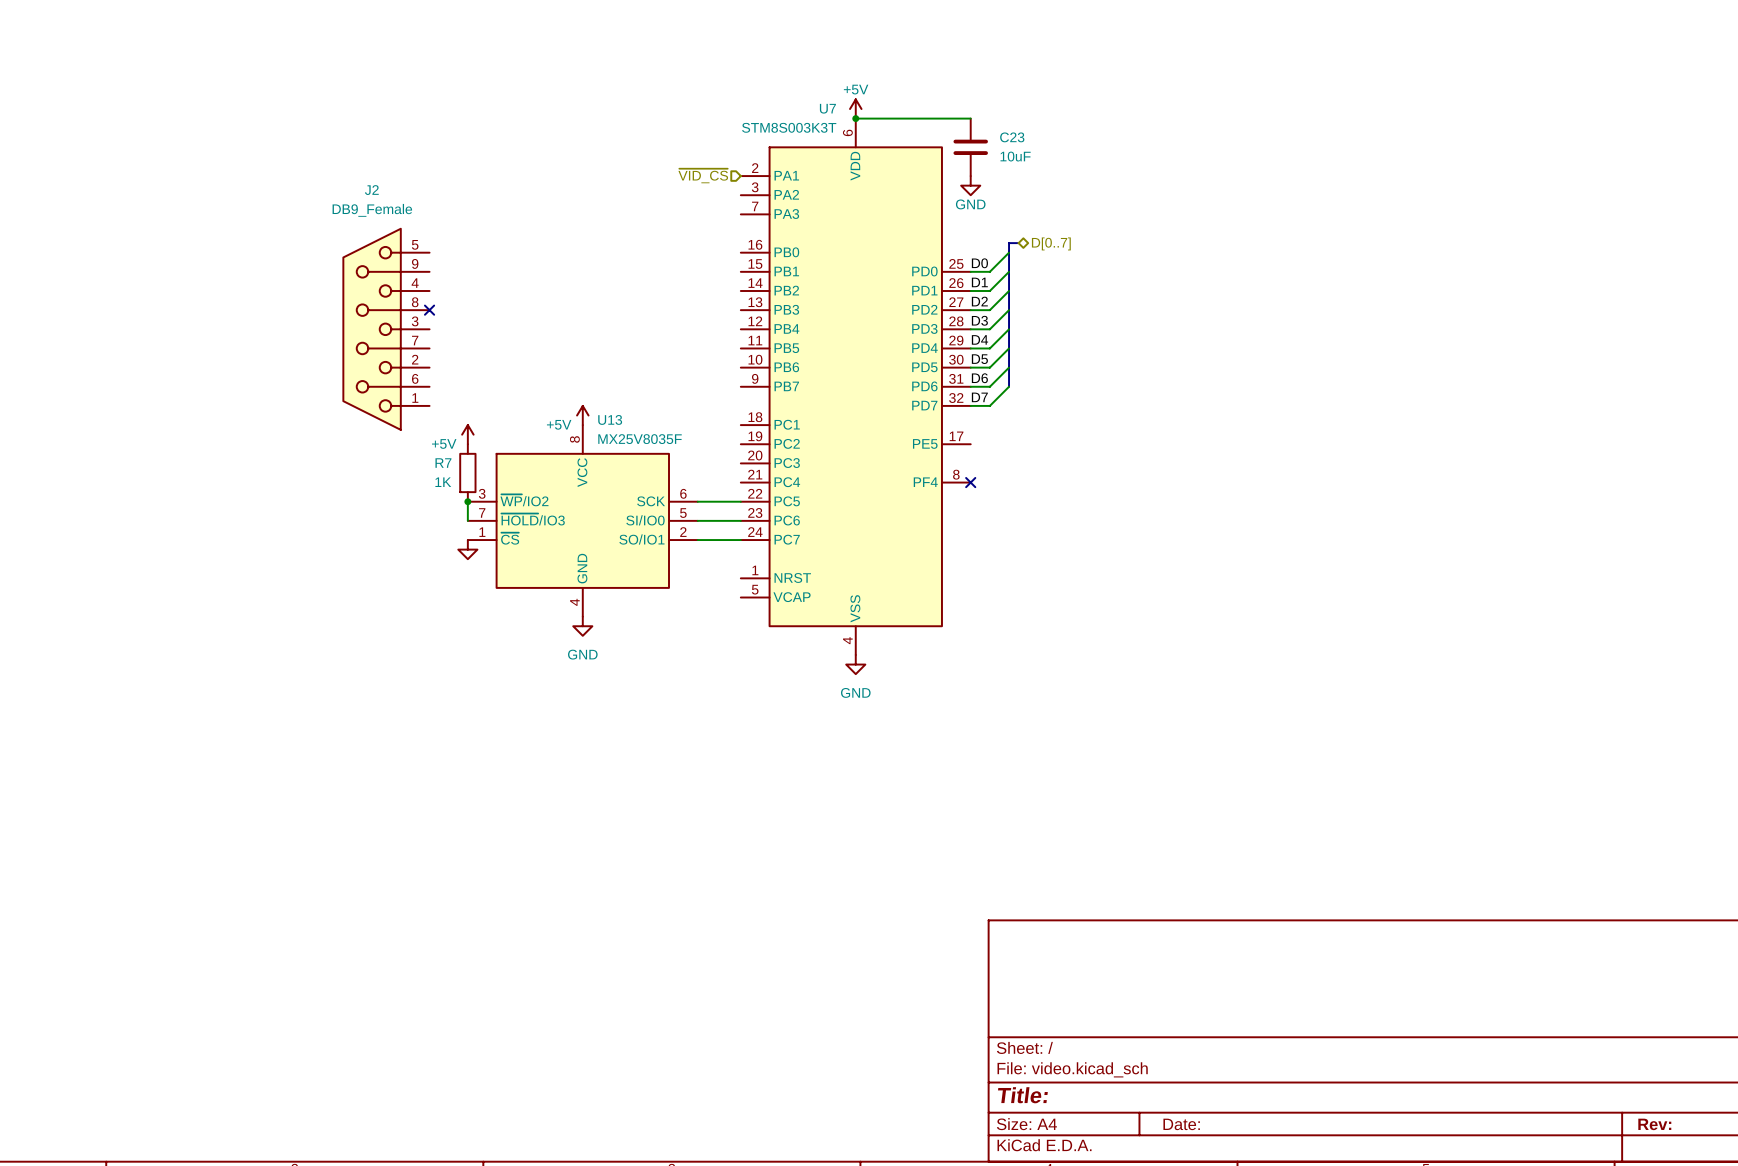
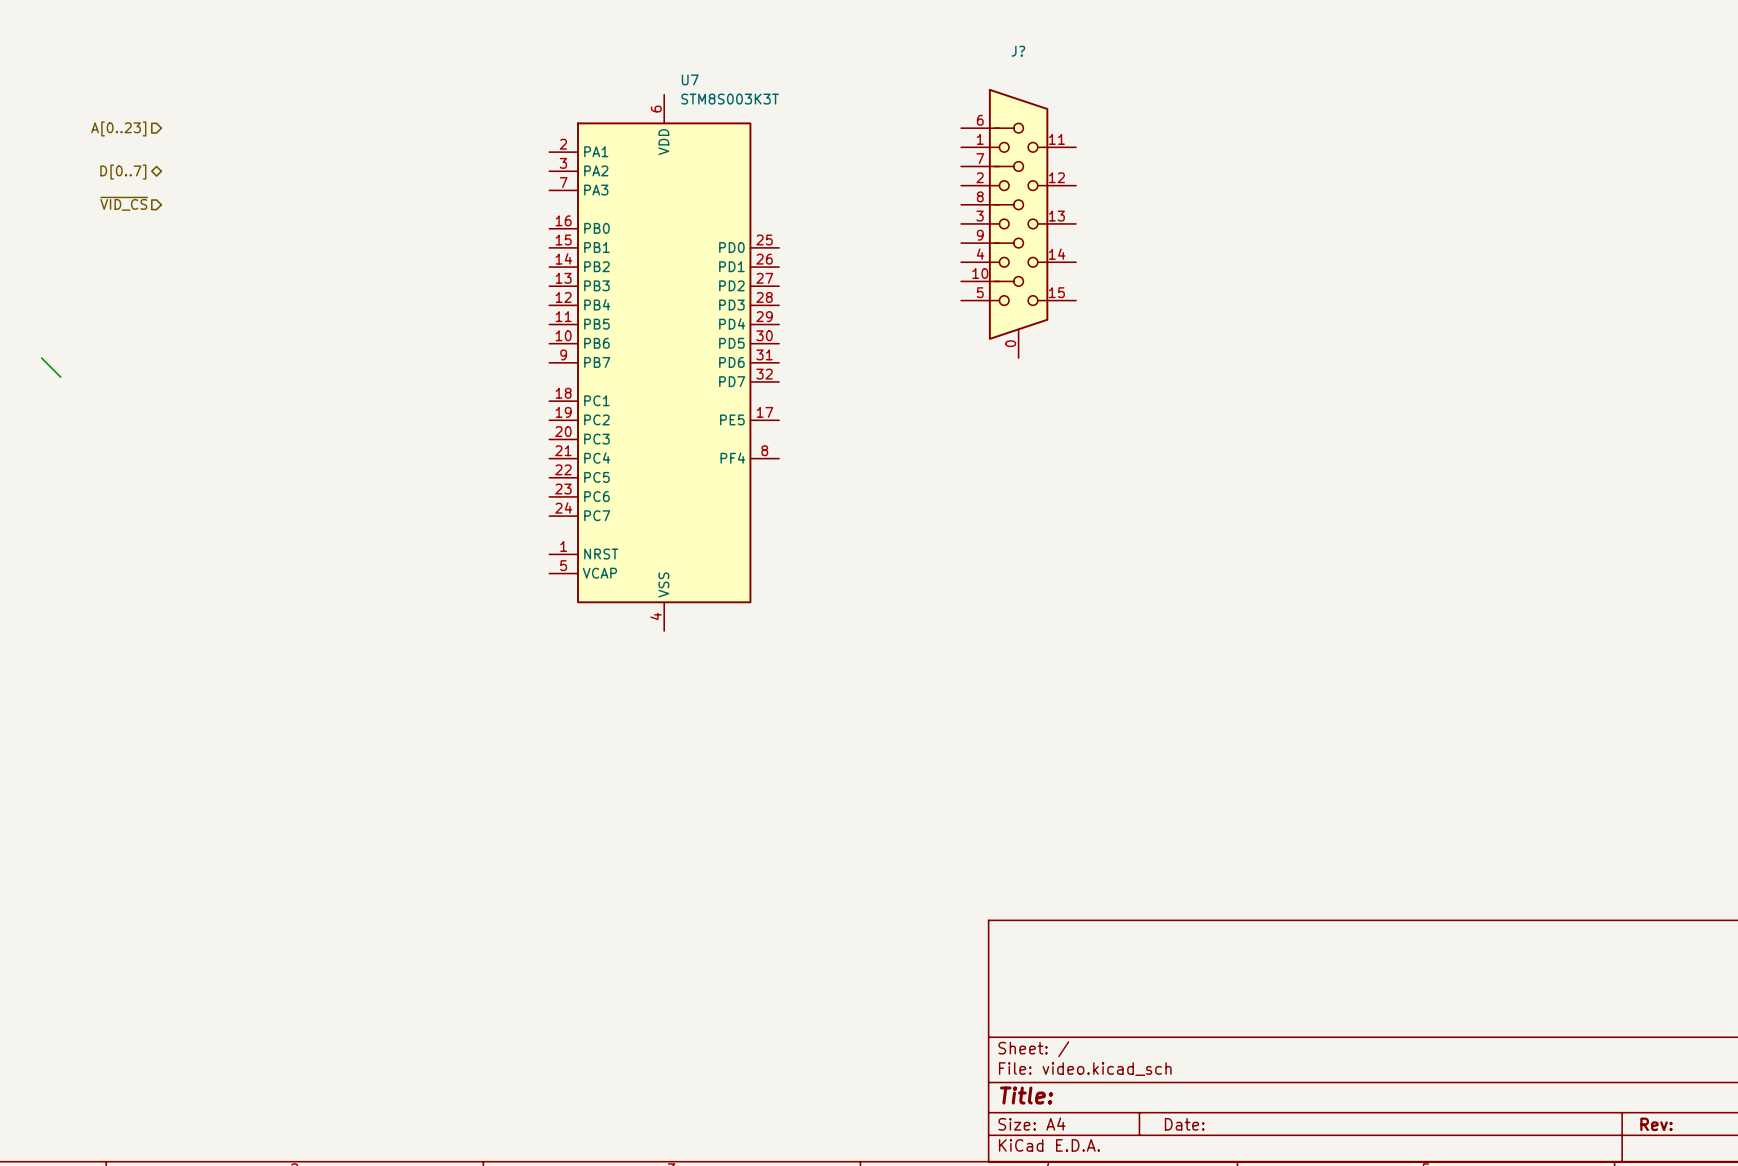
U7 name position: U7 (827, 108) -> U7 (690, 79)
power symbol: +5V (855, 109) -> none
wire: (855, 118) (970, 118) -> none
junction: (855, 118) -> none
U7 value position: STM8S003K3T (789, 127) -> STM8S003K3T (730, 99)
hierarchical label: none -> A[0..23] (118, 128)
C23: 10uF (970, 147) -> none
hierarchical label: none -> D[0..7] (123, 172)
hierarchical label: ~{VID_CS} (703, 175) -> none
power symbol: GND (970, 185) -> none
hierarchical label: none -> ~{VID_CS} (124, 203)
J?: none -> (1018, 223)
bus: (1018, 243) (1009, 243) (1009, 386) -> none
hierarchical label: D[0..7] (1051, 243) -> none
label: D0 (979, 263) -> none
wire: (970, 271) (989, 271) -> none
label: D1 (979, 282) -> none
wire: (970, 291) (989, 291) -> none
label: D2 (979, 301) -> none
no-connect mark: (429, 310) -> none
wire: (970, 310) (989, 310) -> none
label: D3 (979, 320) -> none
J2: DB9_Female (385, 329) -> none
wire: (970, 329) (989, 329) -> none
wire: (1009, 329) (989, 348) -> none
label: D4 (979, 339) -> none
wire: (970, 348) (989, 348) -> none
wire: (1009, 348) (989, 367) -> none
wire: none -> (41, 358) (60, 377)
label: D5 (979, 359) -> none
wire: (970, 367) (989, 367) -> none
wire: (1009, 367) (989, 386) -> none
label: D6 (979, 378) -> none
U7 position: (855, 386) -> (664, 362)
wire: (970, 386) (989, 386) -> none
wire: (1009, 386) (989, 405) -> none
label: D7 (979, 397) -> none
wire: (970, 405) (989, 405) -> none
power symbol: +5V (582, 415) -> none
power symbol: +5V (467, 434) -> none
R7: 1K (467, 472) -> none
no-connect mark: (970, 482) -> none
wire: (467, 501) (467, 520) -> none
junction: (467, 501) -> none
U13: MX25V8035F (582, 520) -> none
power symbol: (467, 549) -> none
power symbol: GND (582, 626) -> none
power symbol: GND (855, 664) -> none

